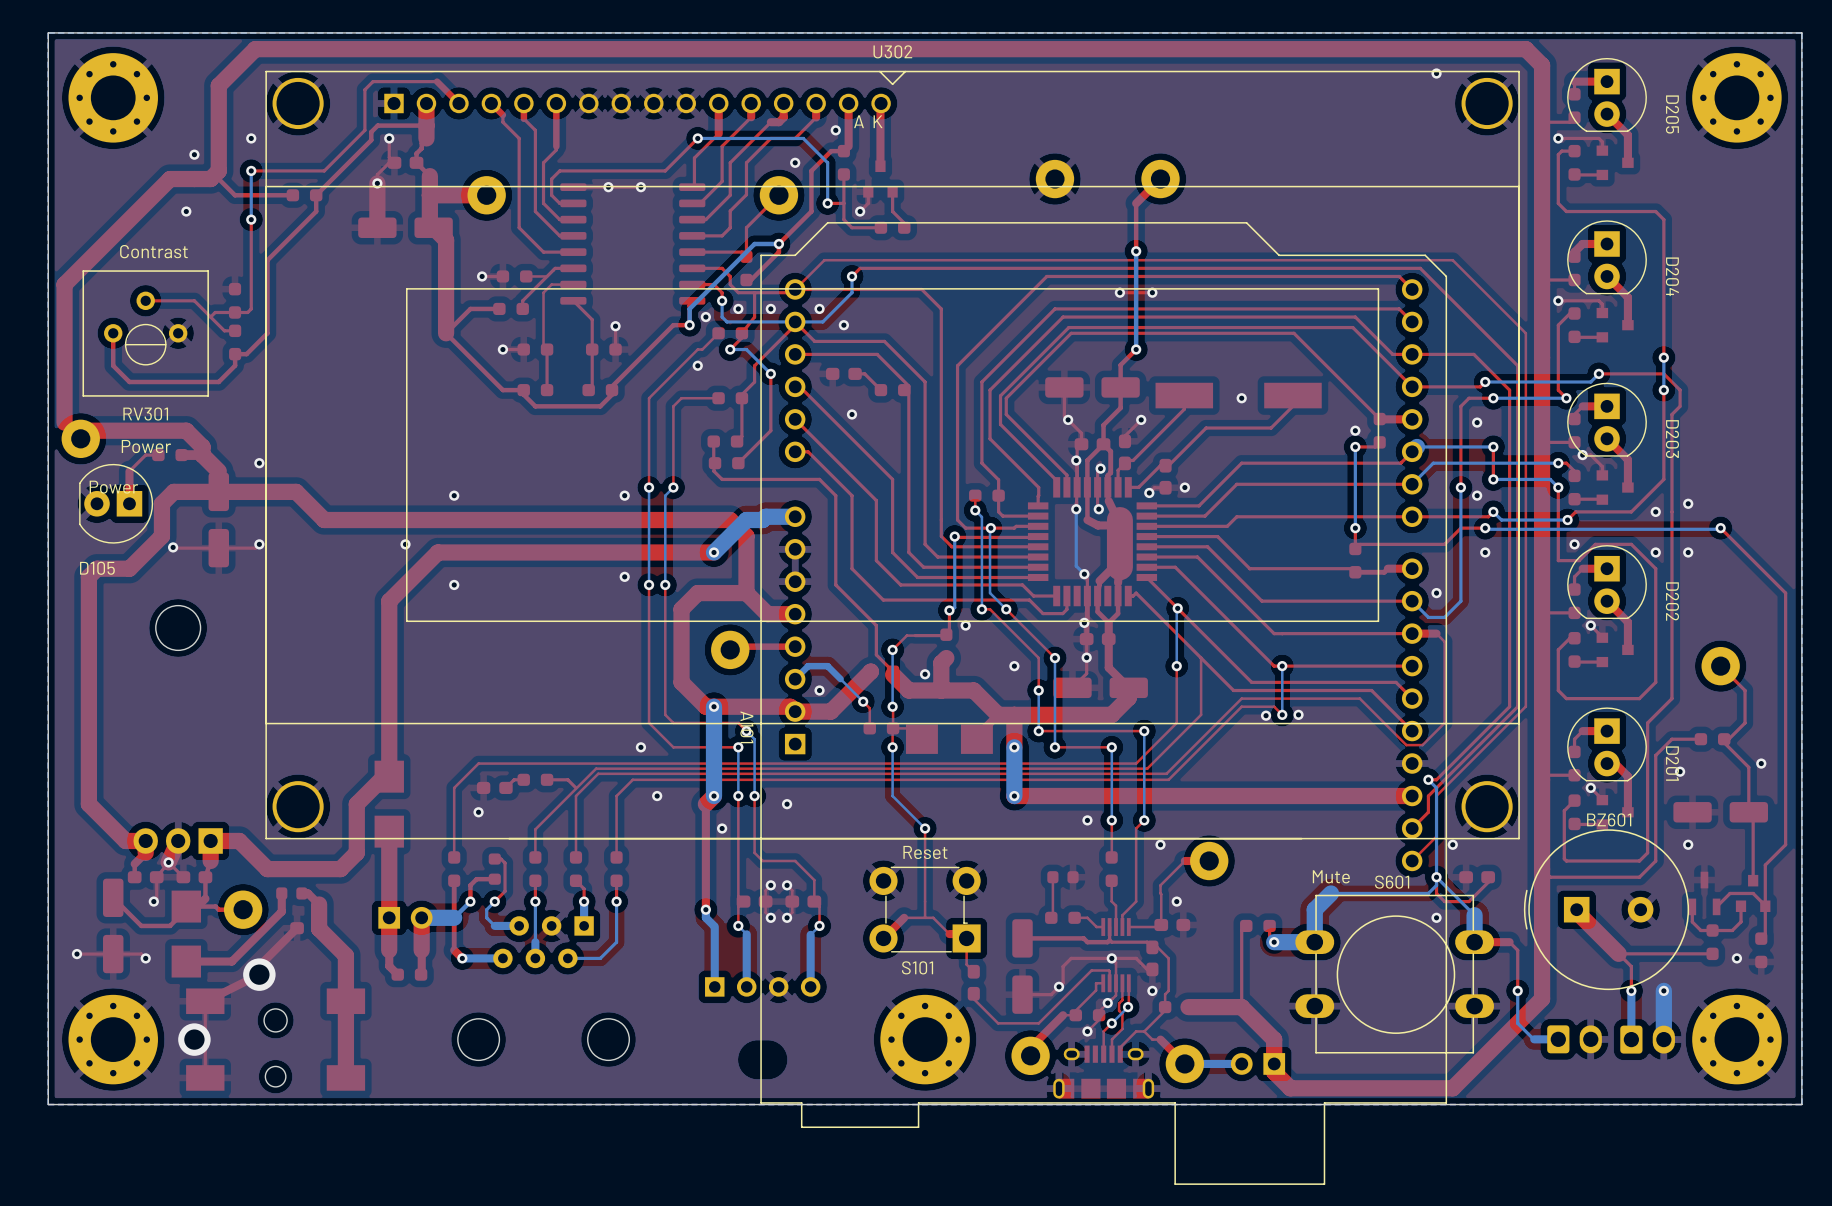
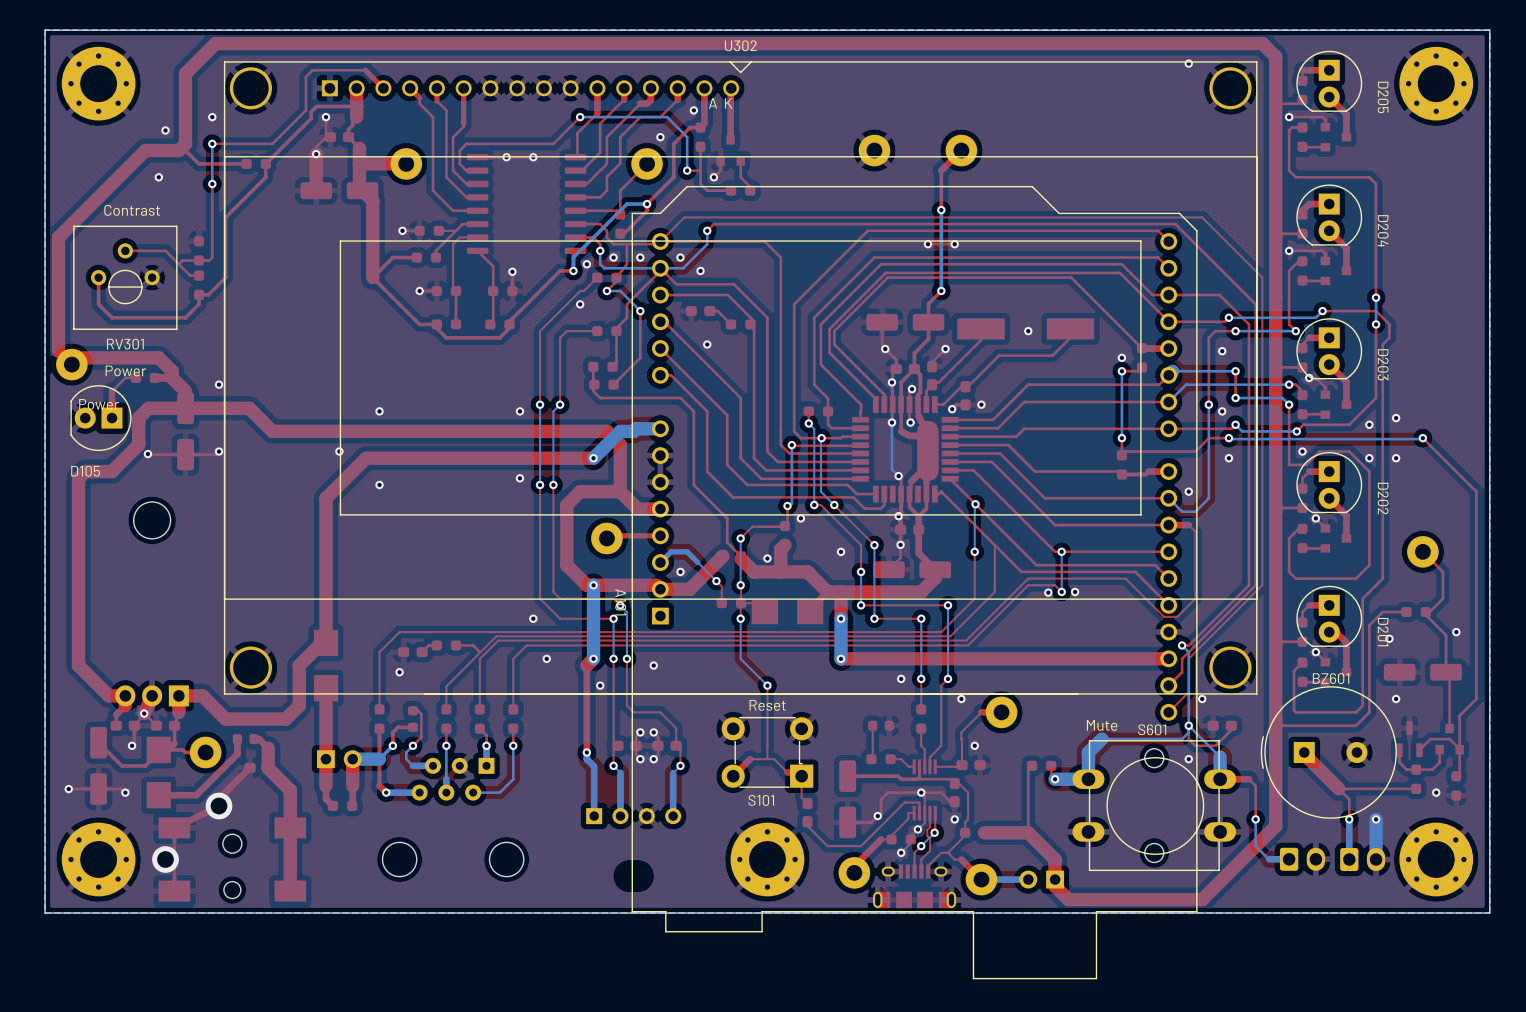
S601 footprint: [1295, 894, 1495, 1054] -> [1072, 740, 1237, 871]

